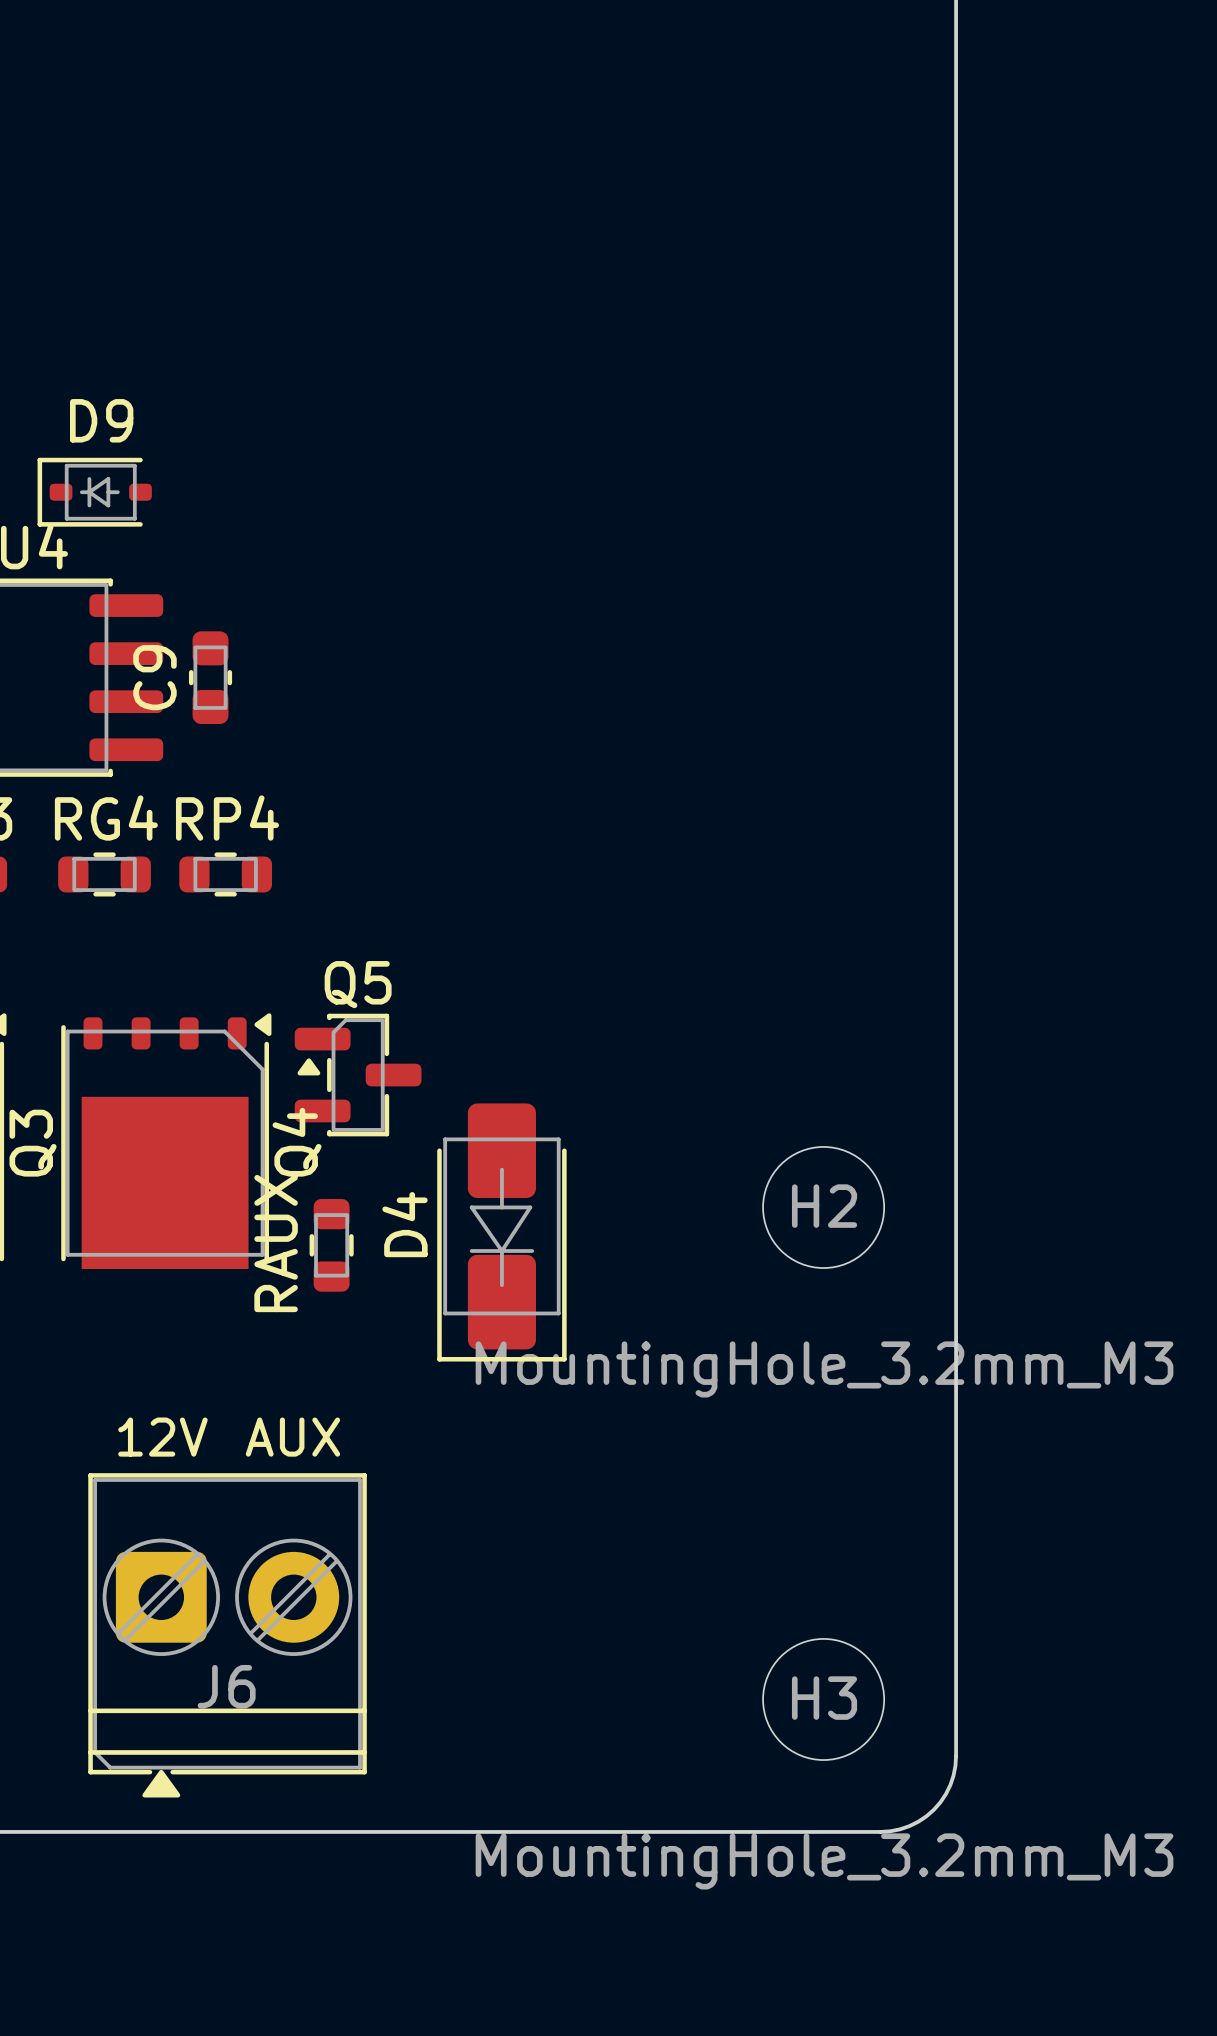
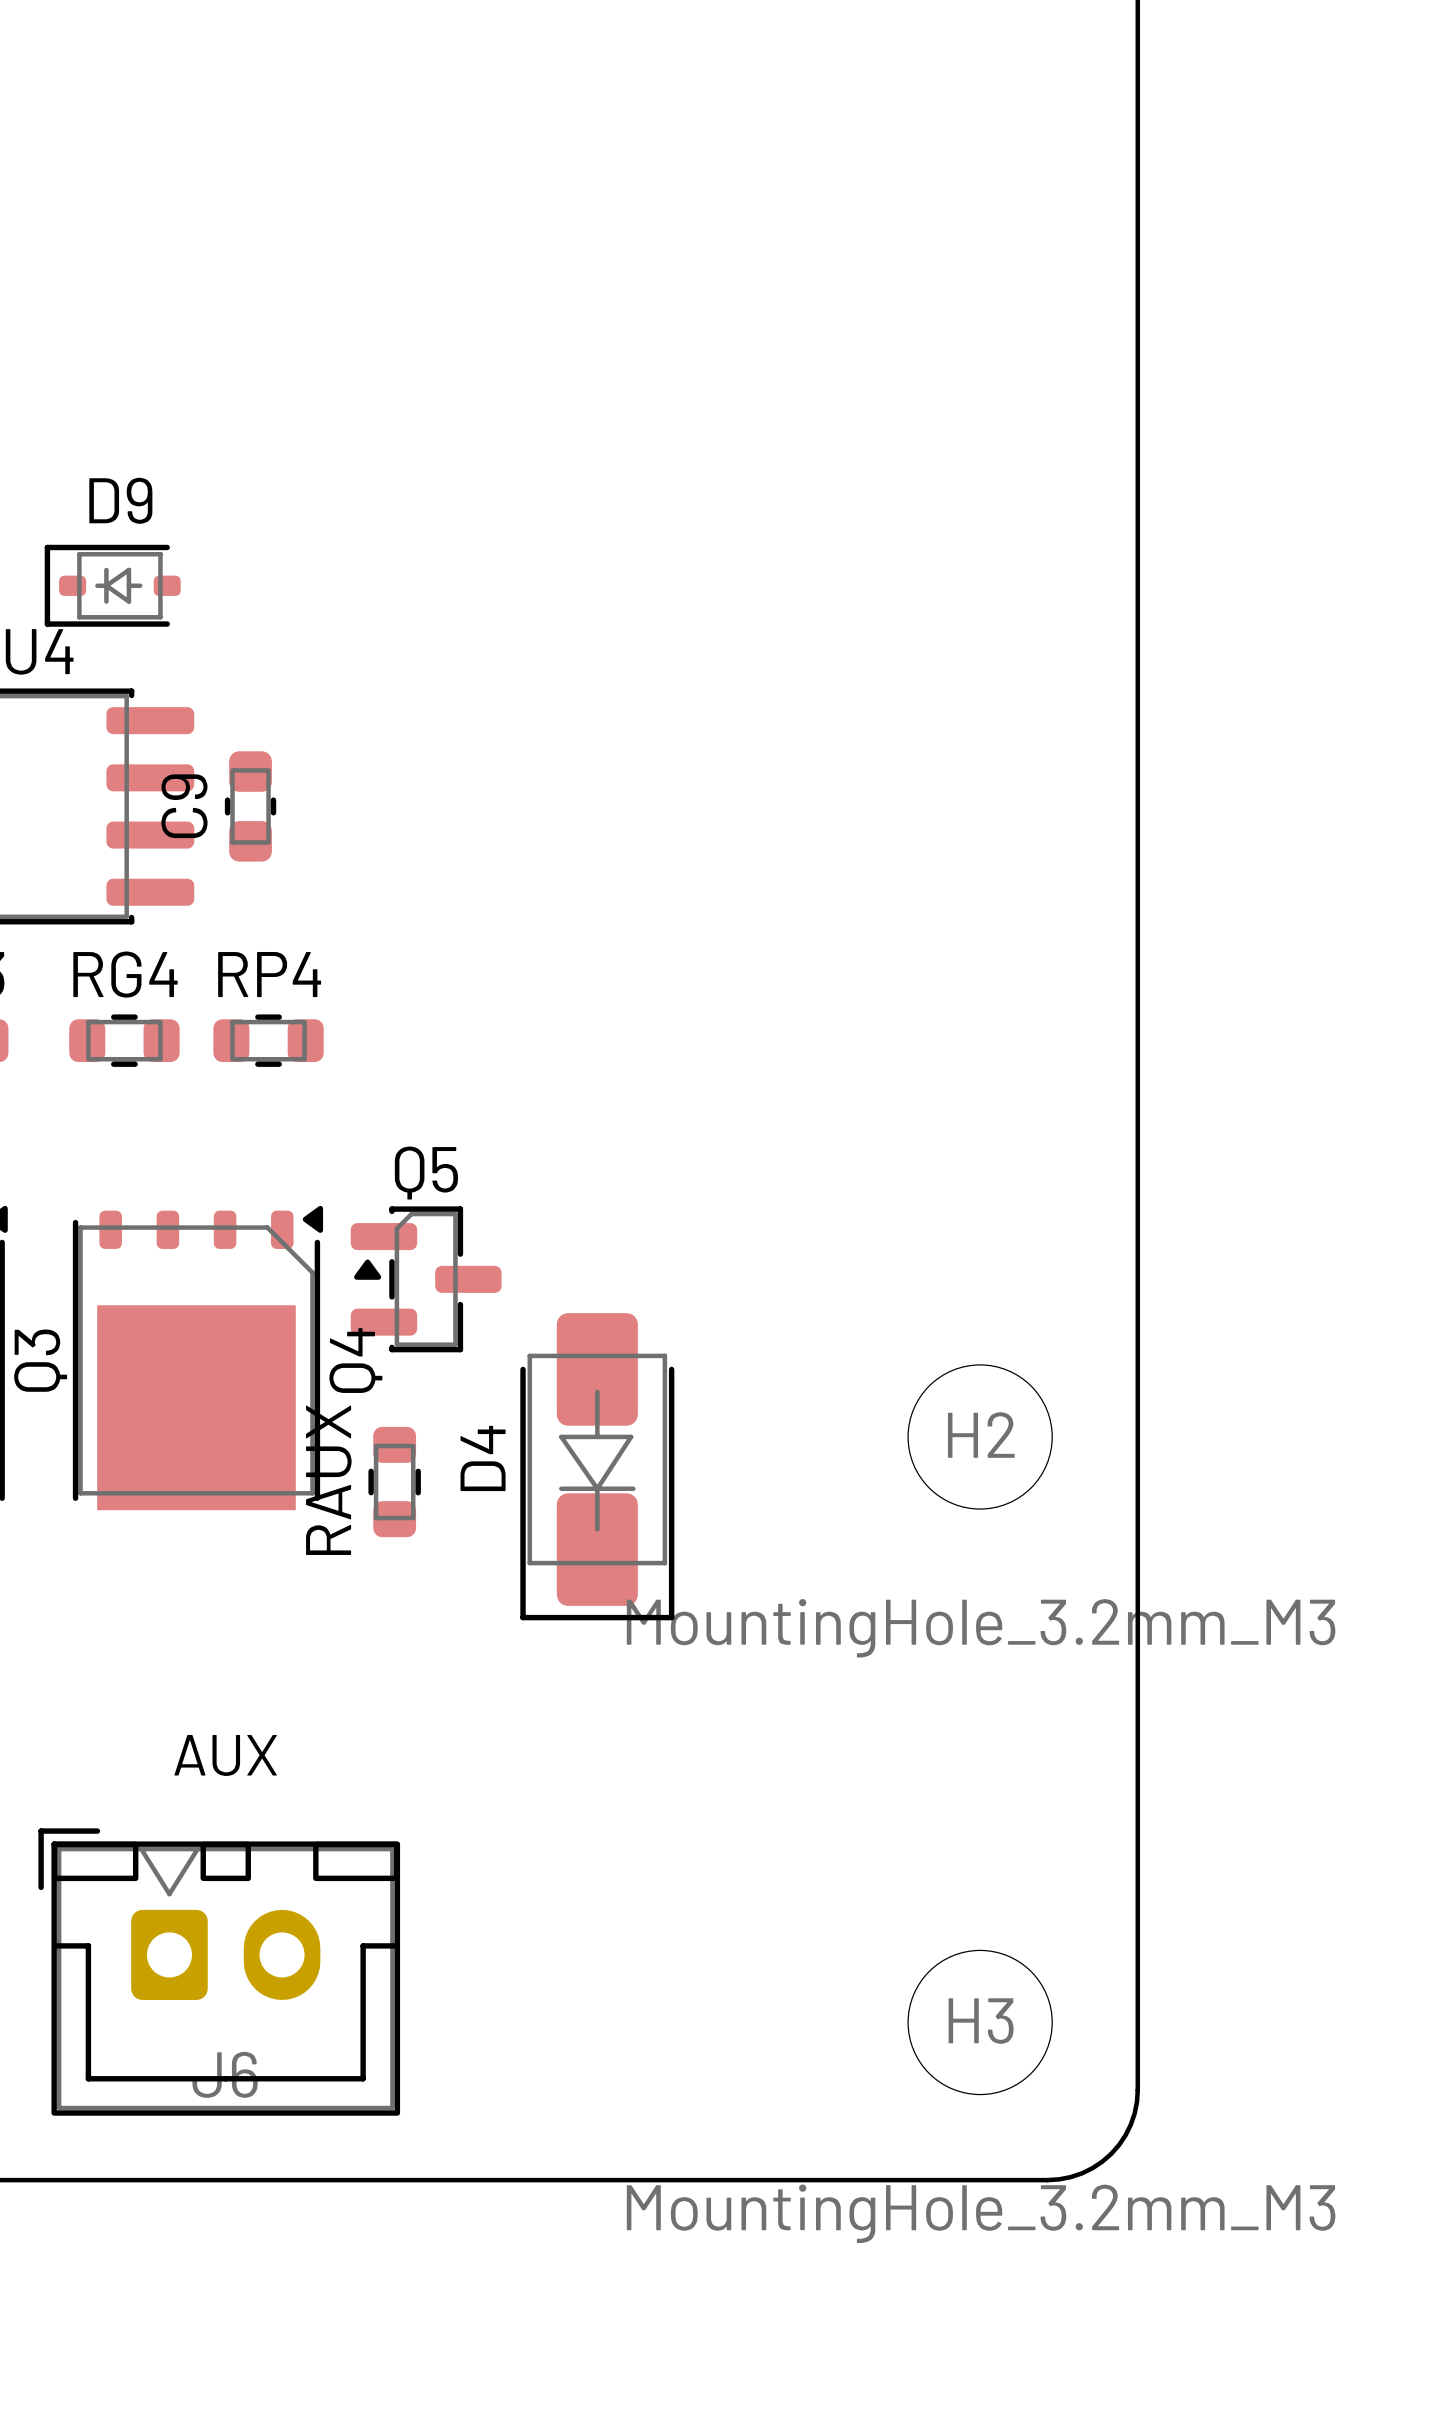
text: 12V (162, 1437) -> none
text position: AUX (292, 1437) -> AUX (225, 1755)
J6 footprint: [88, 1473, 367, 1798] -> [38, 1828, 401, 2116]

